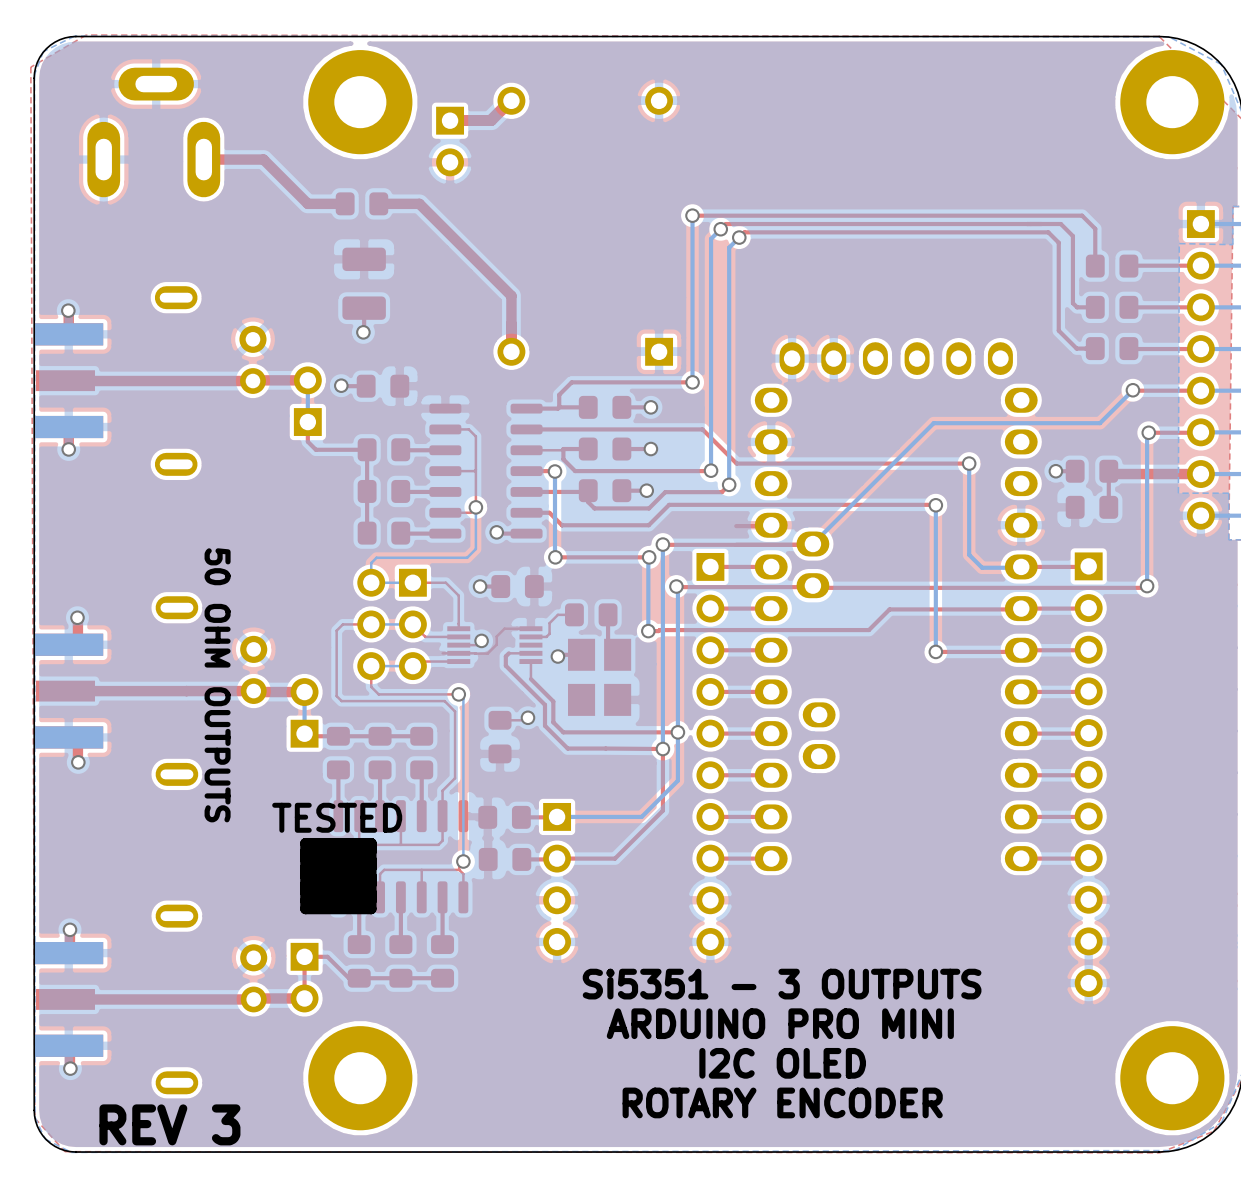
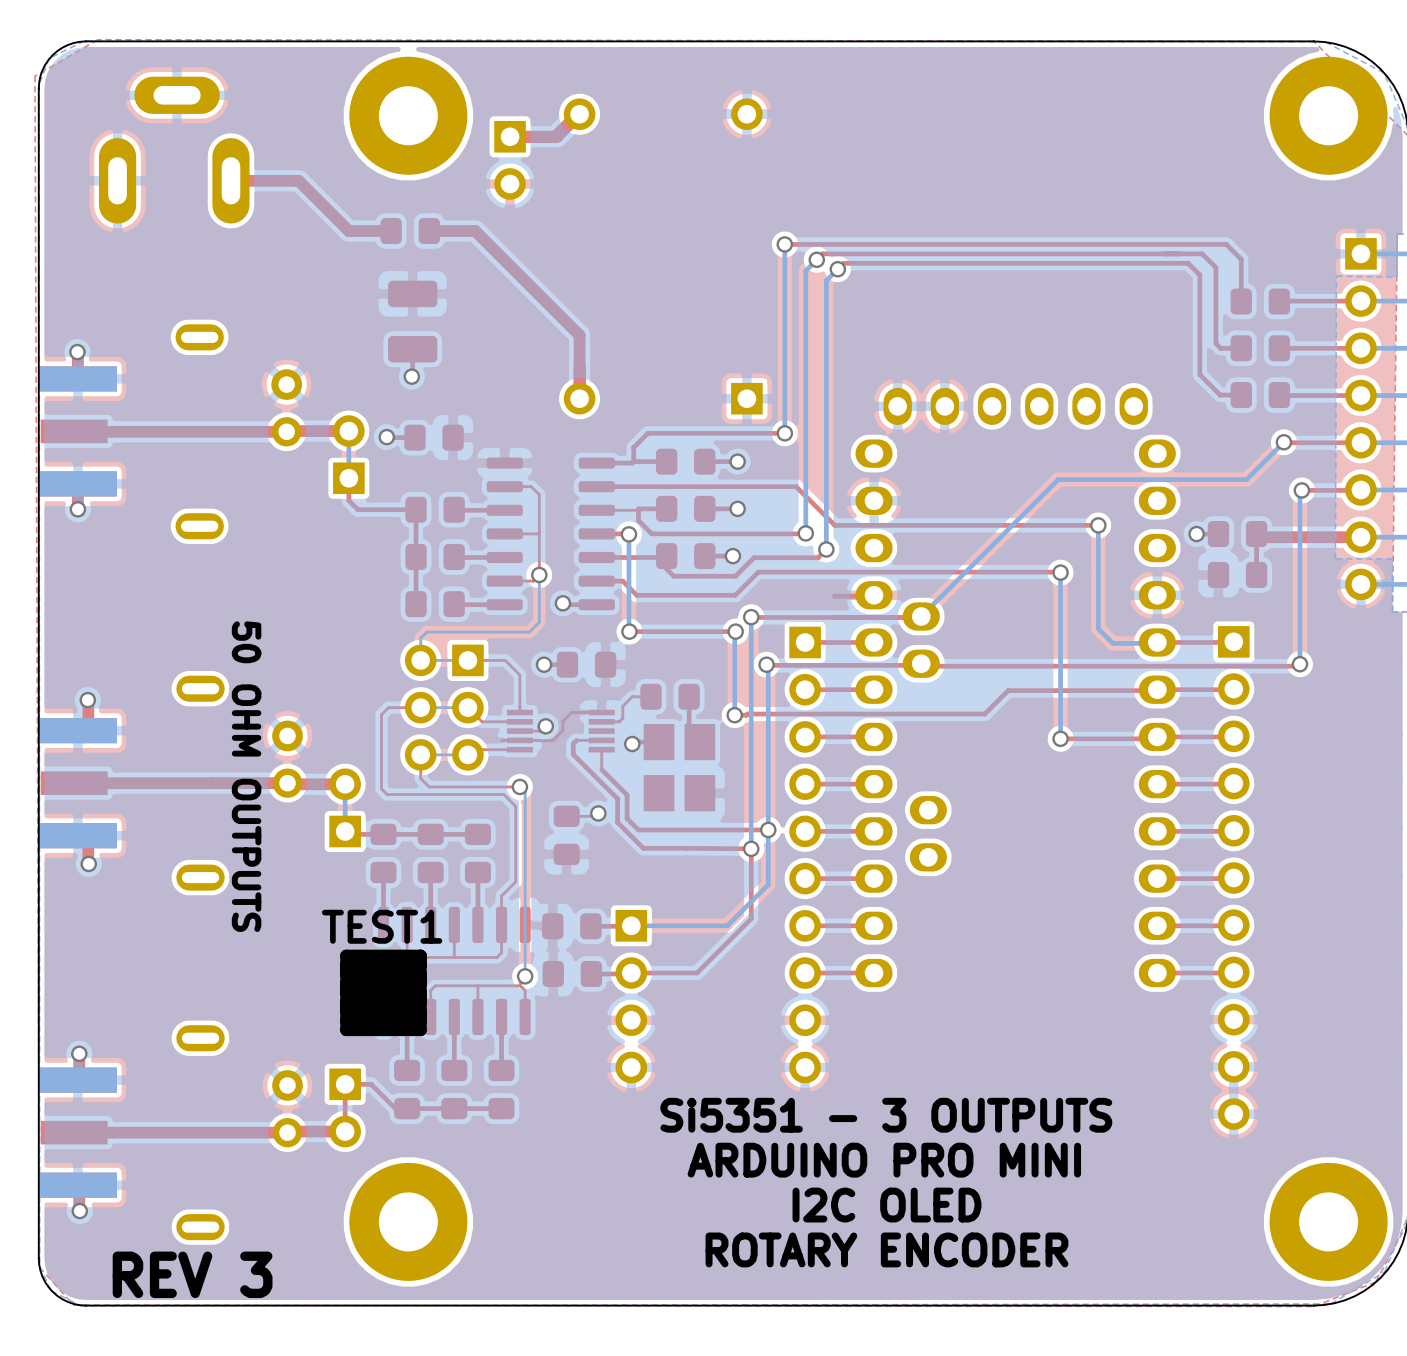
TESTED name: TESTED (337, 817) -> TEST1 (382, 926)

